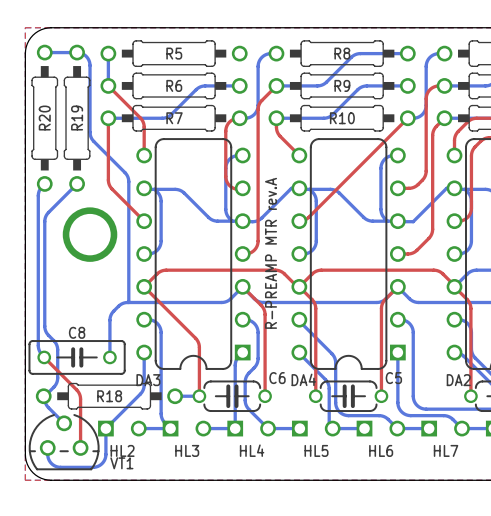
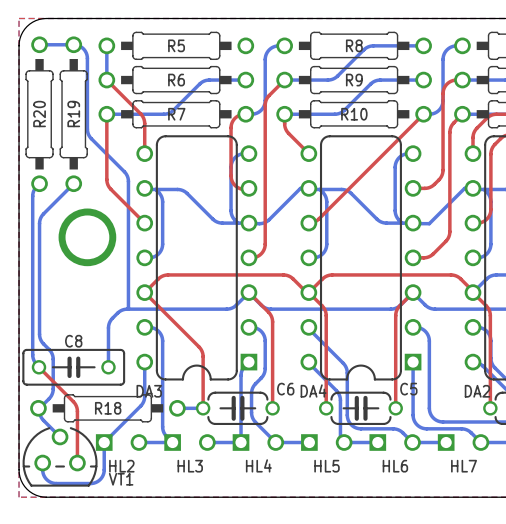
drawing: [264, 177, 278, 329] -> none

